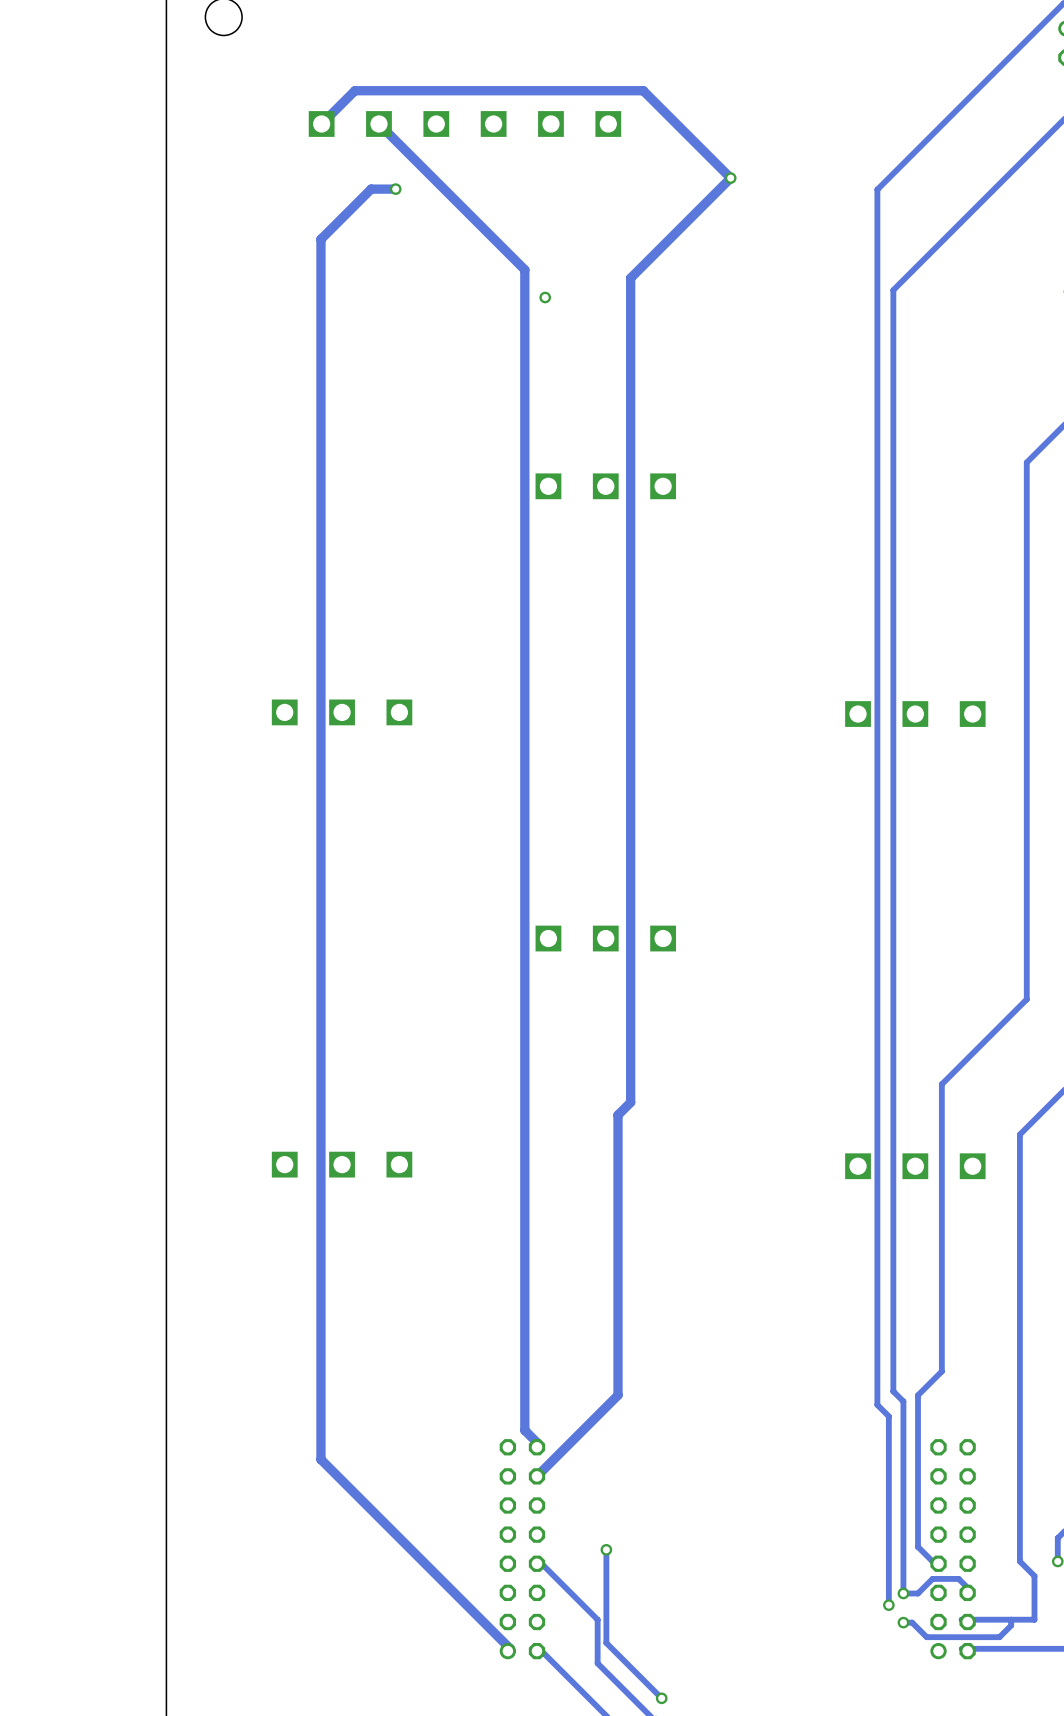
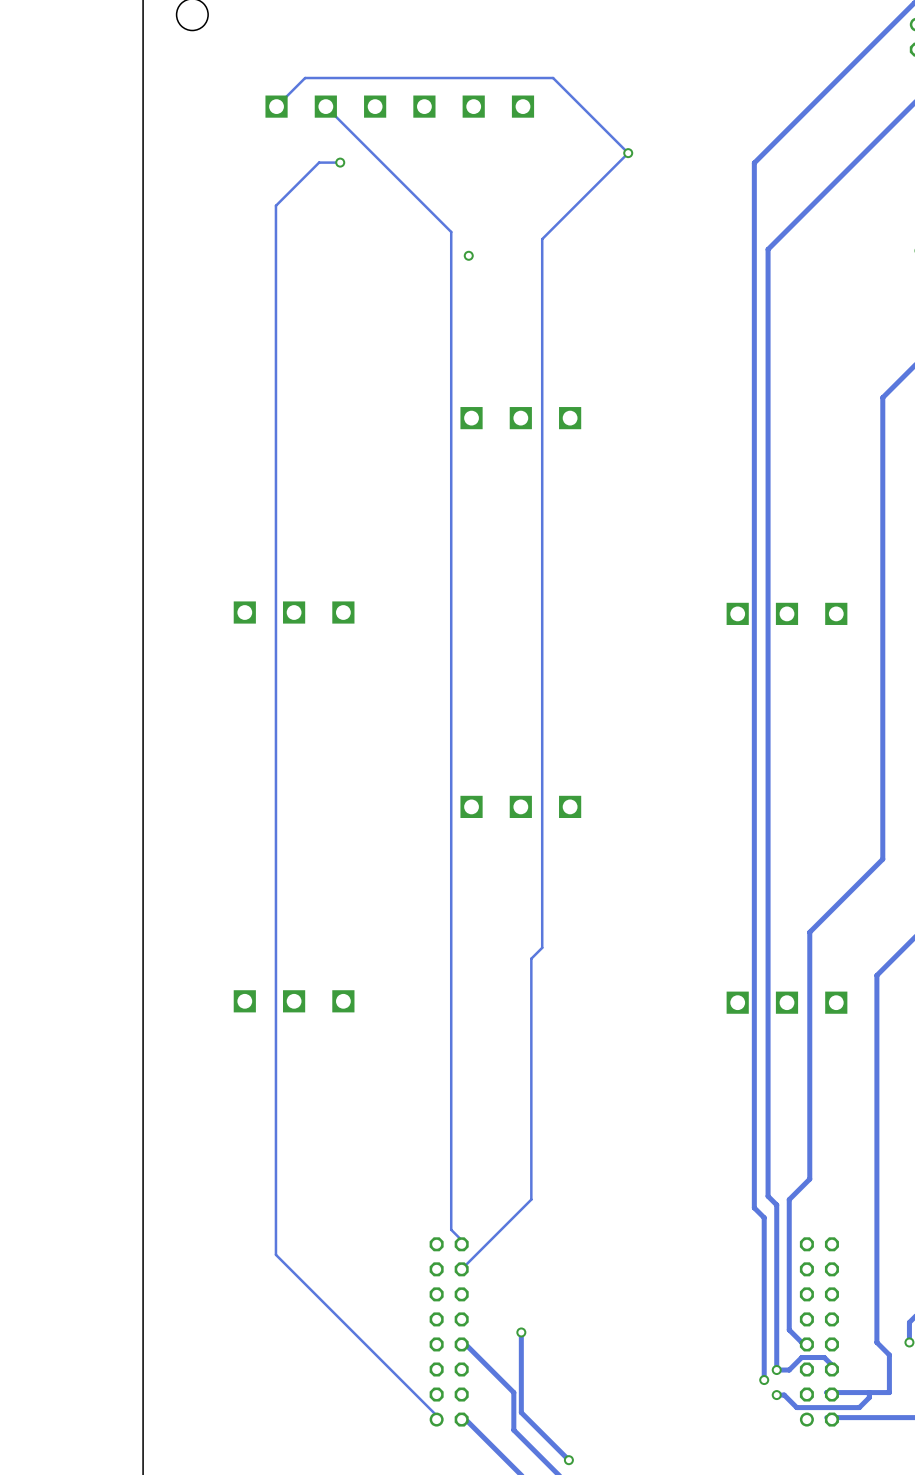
track width: thick (321, 123) (354, 90) (643, 90) (730, 178) (630, 278) (630, 1102) (618, 1115) (618, 1395) (539, 1473) -> thin (276, 106) (305, 78) (553, 78) (628, 153) (542, 239) (542, 947) (531, 958) (531, 1199) (463, 1267)
track width: thick (378, 123) (524, 269) (524, 1430) (539, 1444) -> thin (325, 106) (451, 231) (451, 1229) (463, 1242)
track width: thick (395, 189) (371, 189) (320, 239) (320, 1459) (510, 1648) -> thin (340, 162) (319, 162) (275, 205) (275, 1254) (438, 1417)

